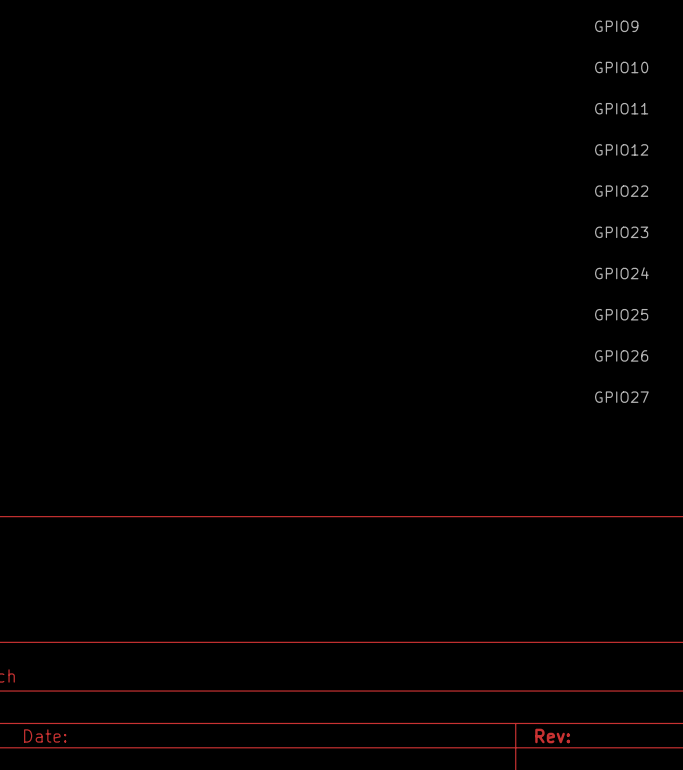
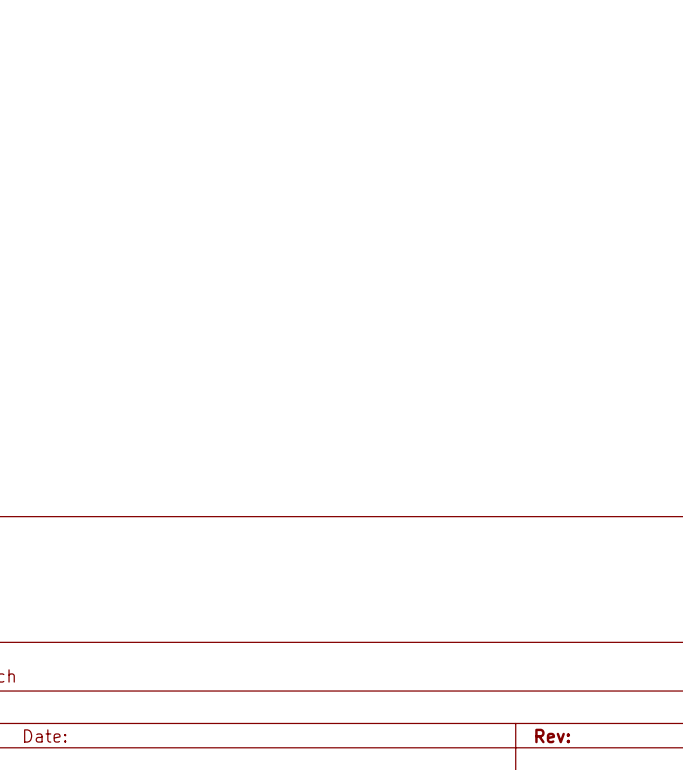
label: GPIO9 (616, 26) -> none
label: GPIO10 (621, 67) -> none
label: GPIO11 (621, 108) -> none
label: GPIO12 (621, 149) -> none
label: GPIO22 (621, 191) -> none
label: GPIO23 (621, 232) -> none
label: GPIO24 (621, 273) -> none
label: GPIO25 (621, 314) -> none
label: GPIO26 (621, 355) -> none
label: GPIO27 (621, 397) -> none

